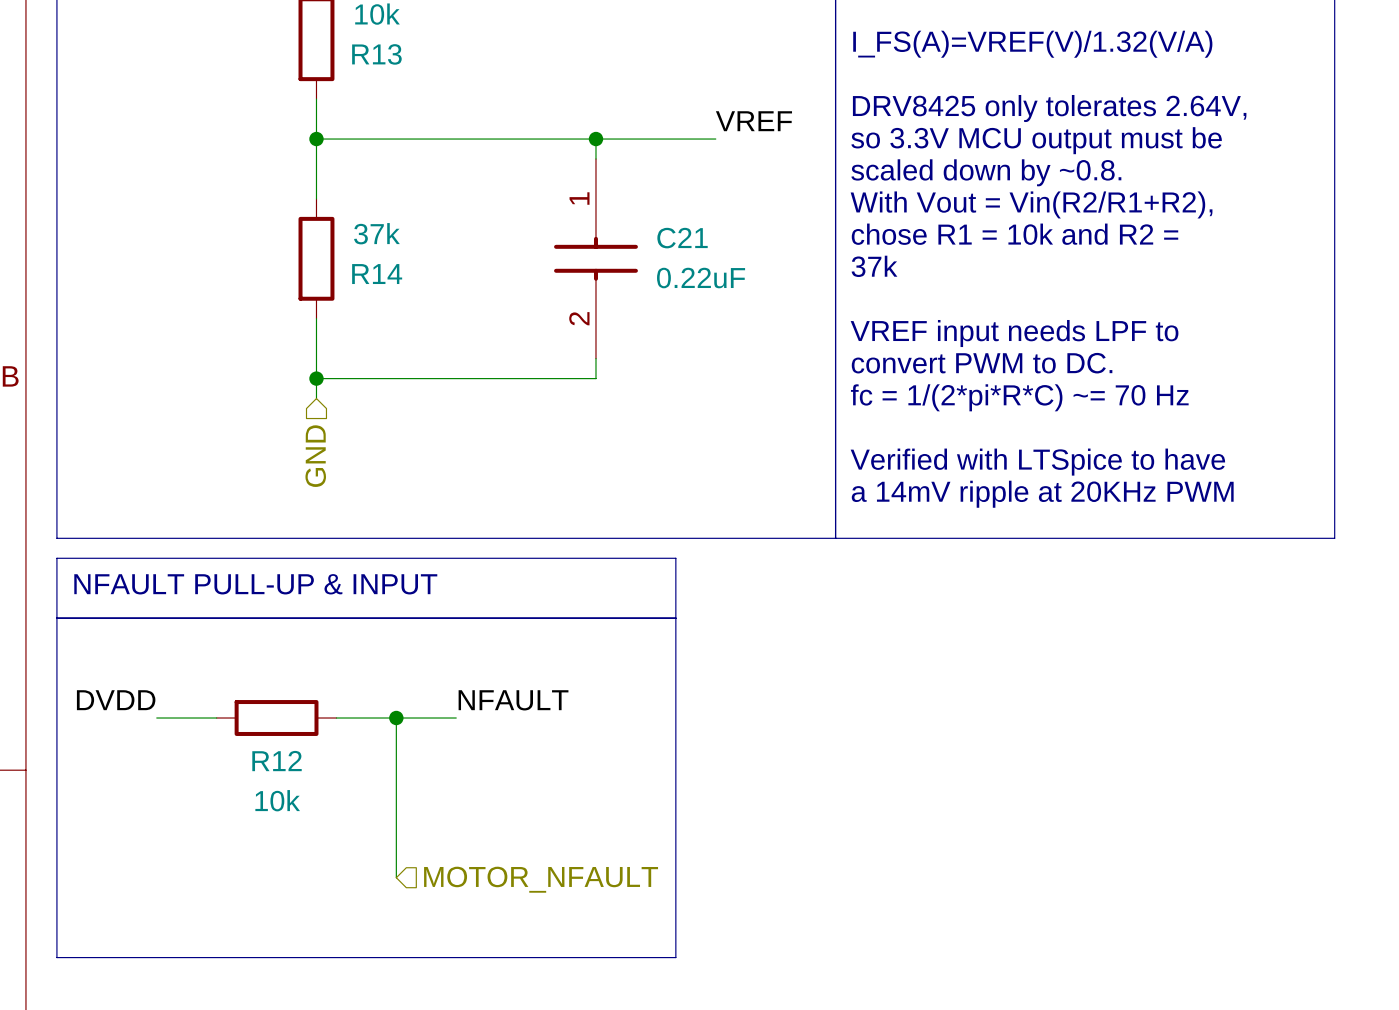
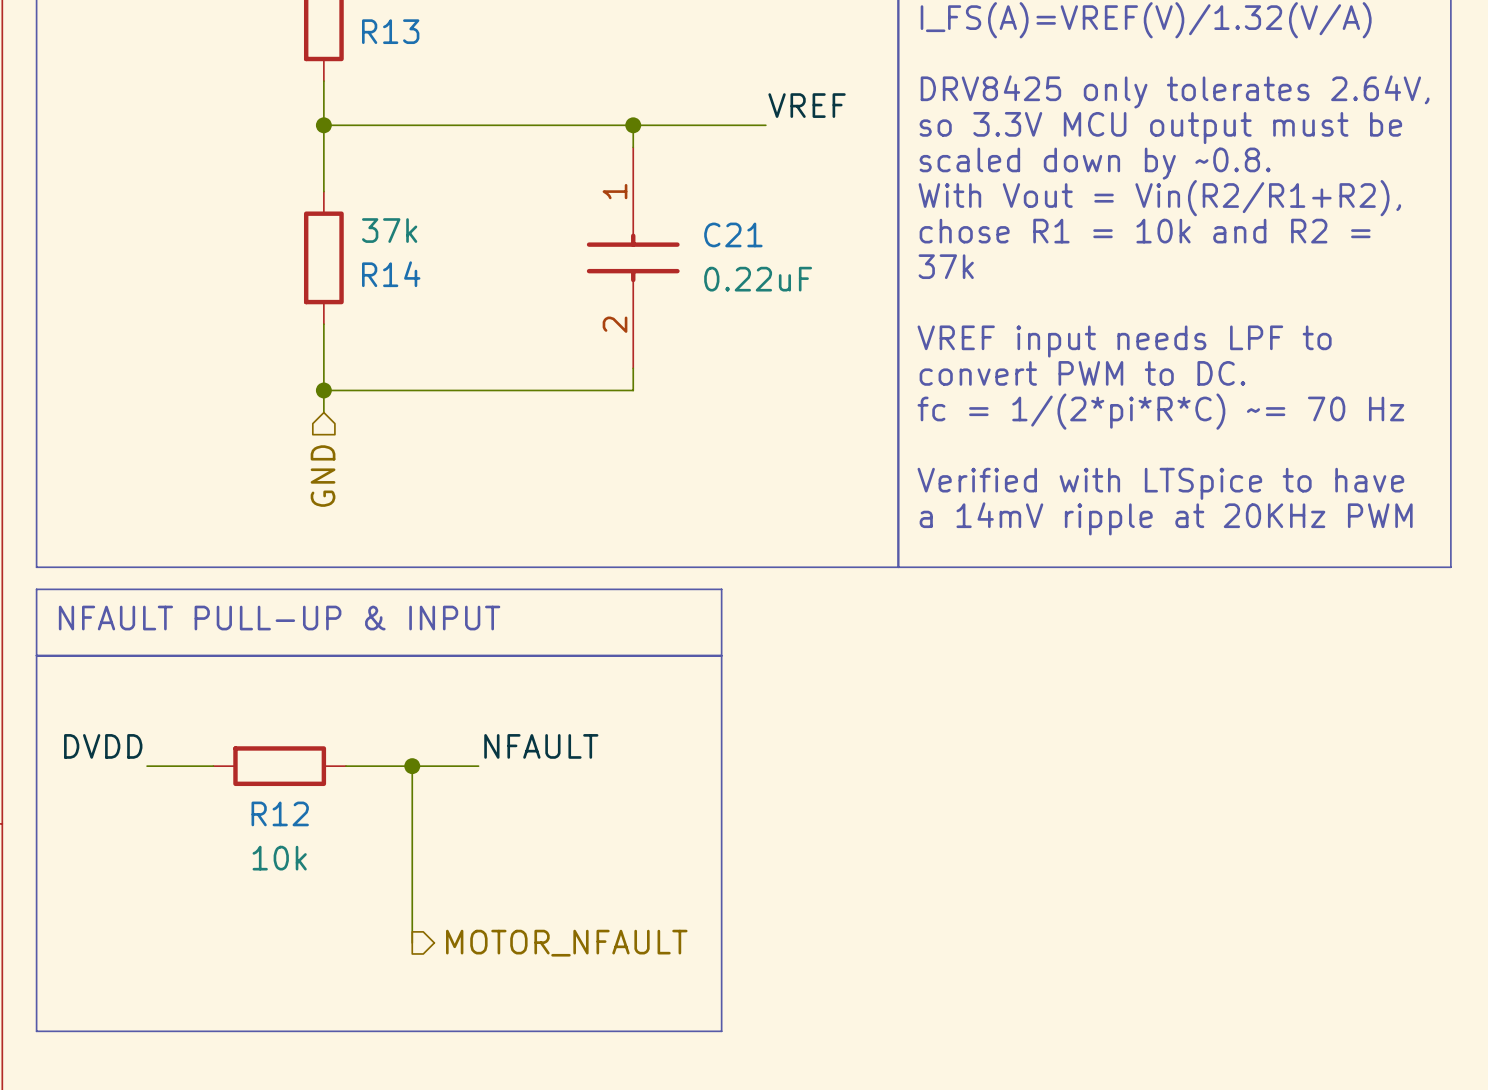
hierarchical label shape: input (541, 879) -> output (566, 943)

